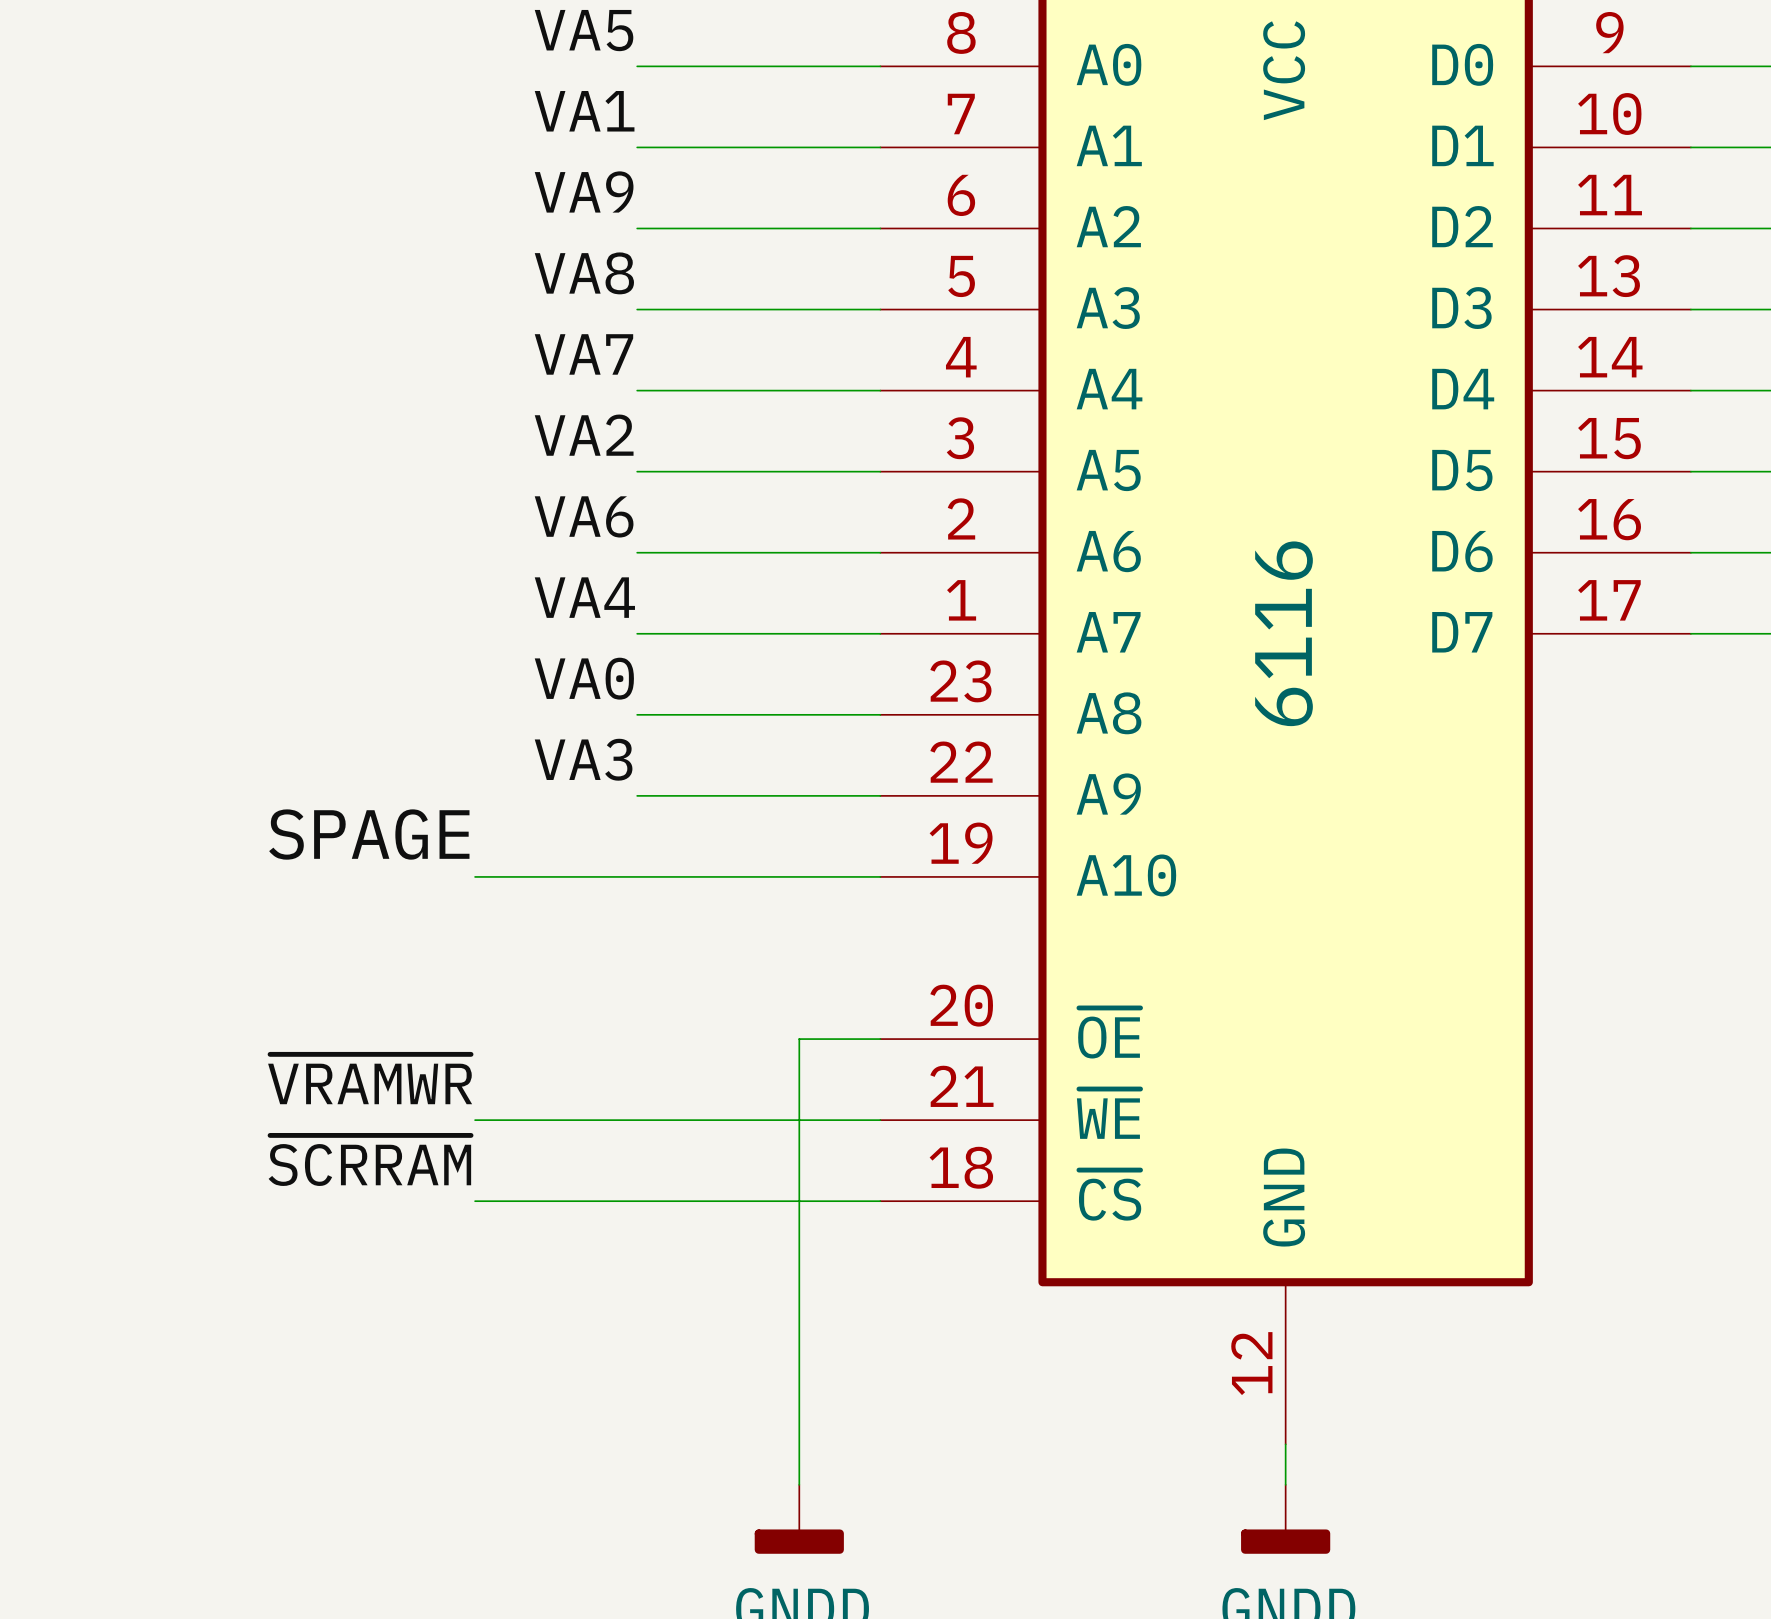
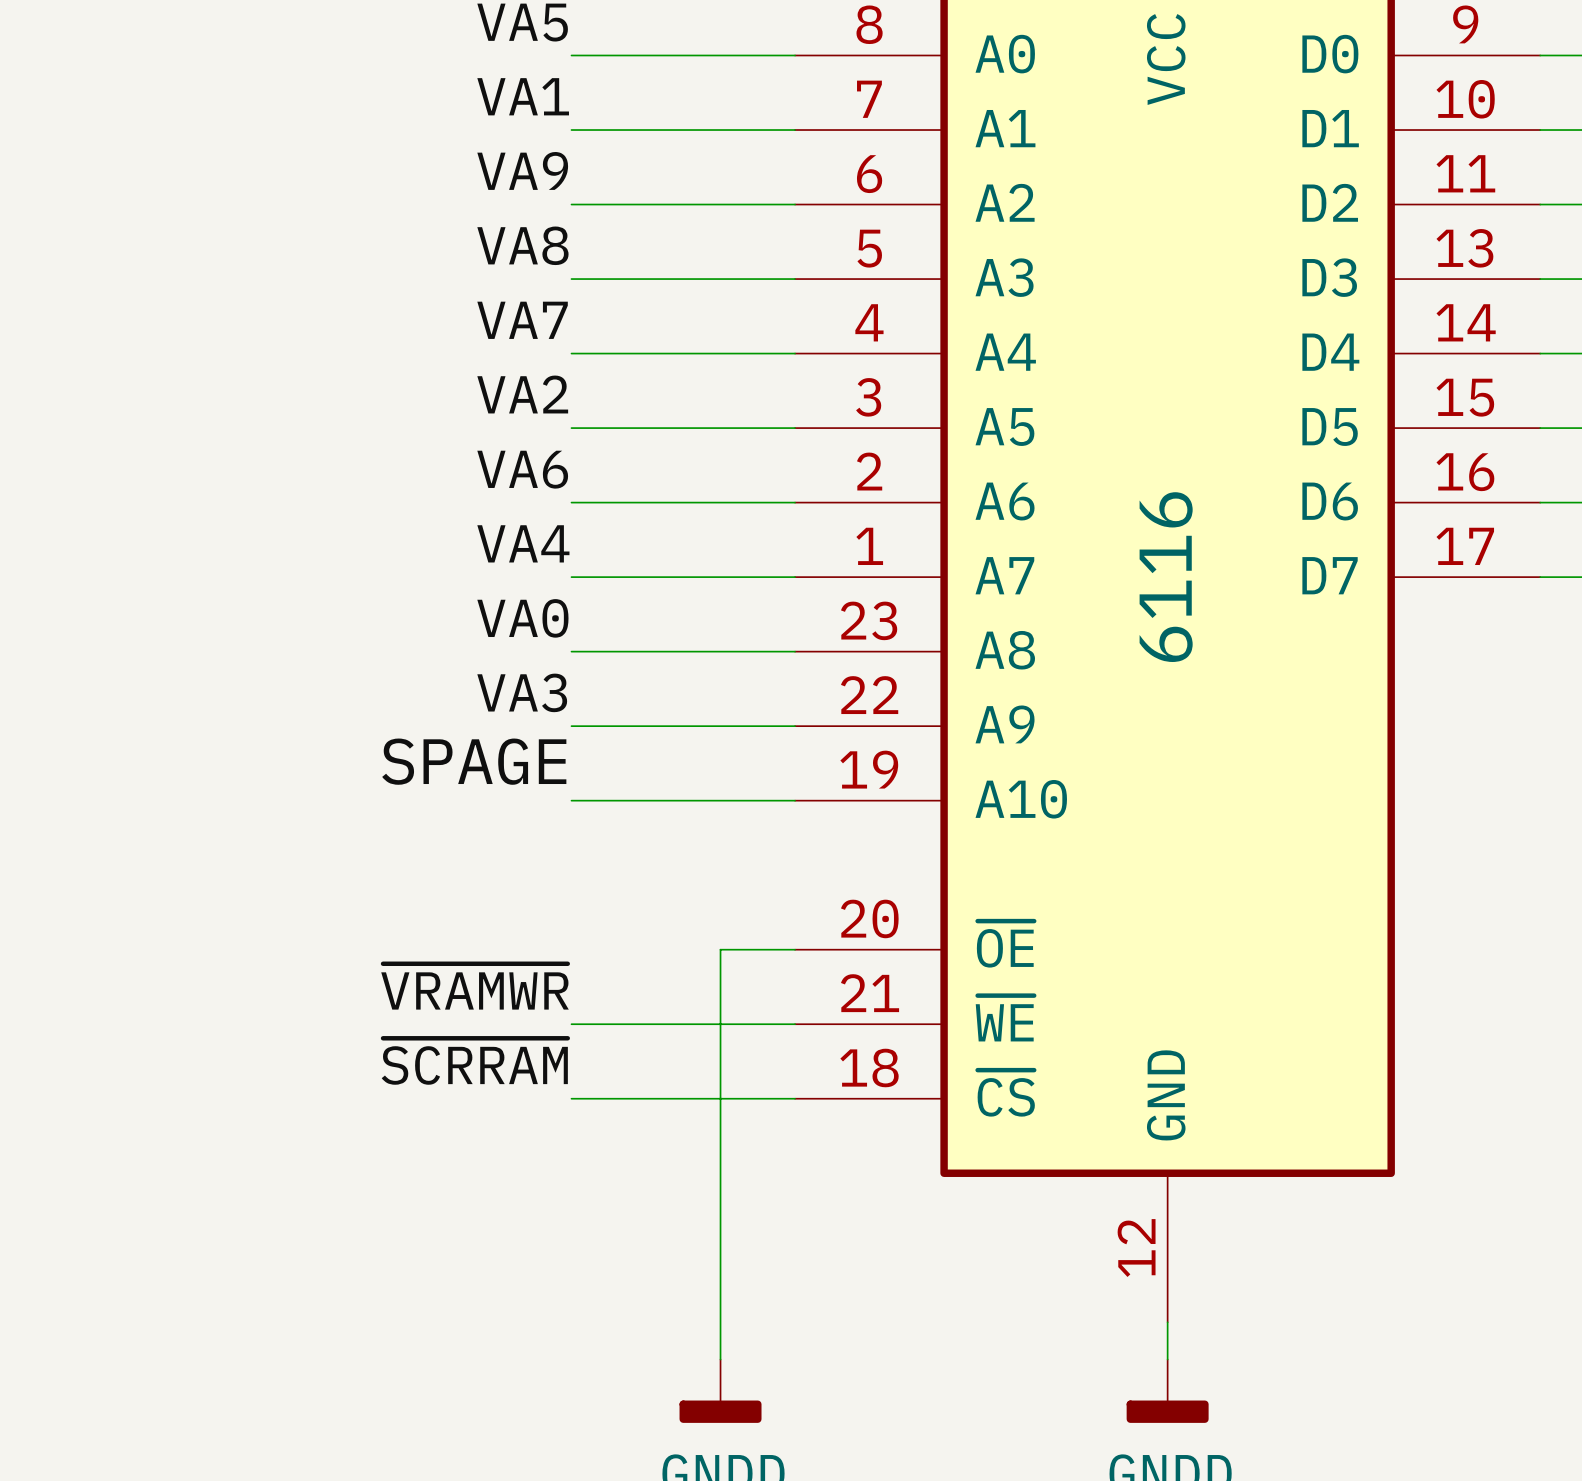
label position: SPAGE (369, 834) -> SPAGE (474, 761)
wire: (475, 876) (637, 876) -> none
label position: ~{VRAMWR} (370, 1079) -> ~{VRAMWR} (475, 986)
wire: (475, 1120) (637, 1120) -> none
label position: ~{SCRRAM} (369, 1160) -> ~{SCRRAM} (474, 1061)
wire: (475, 1201) (637, 1201) -> none

